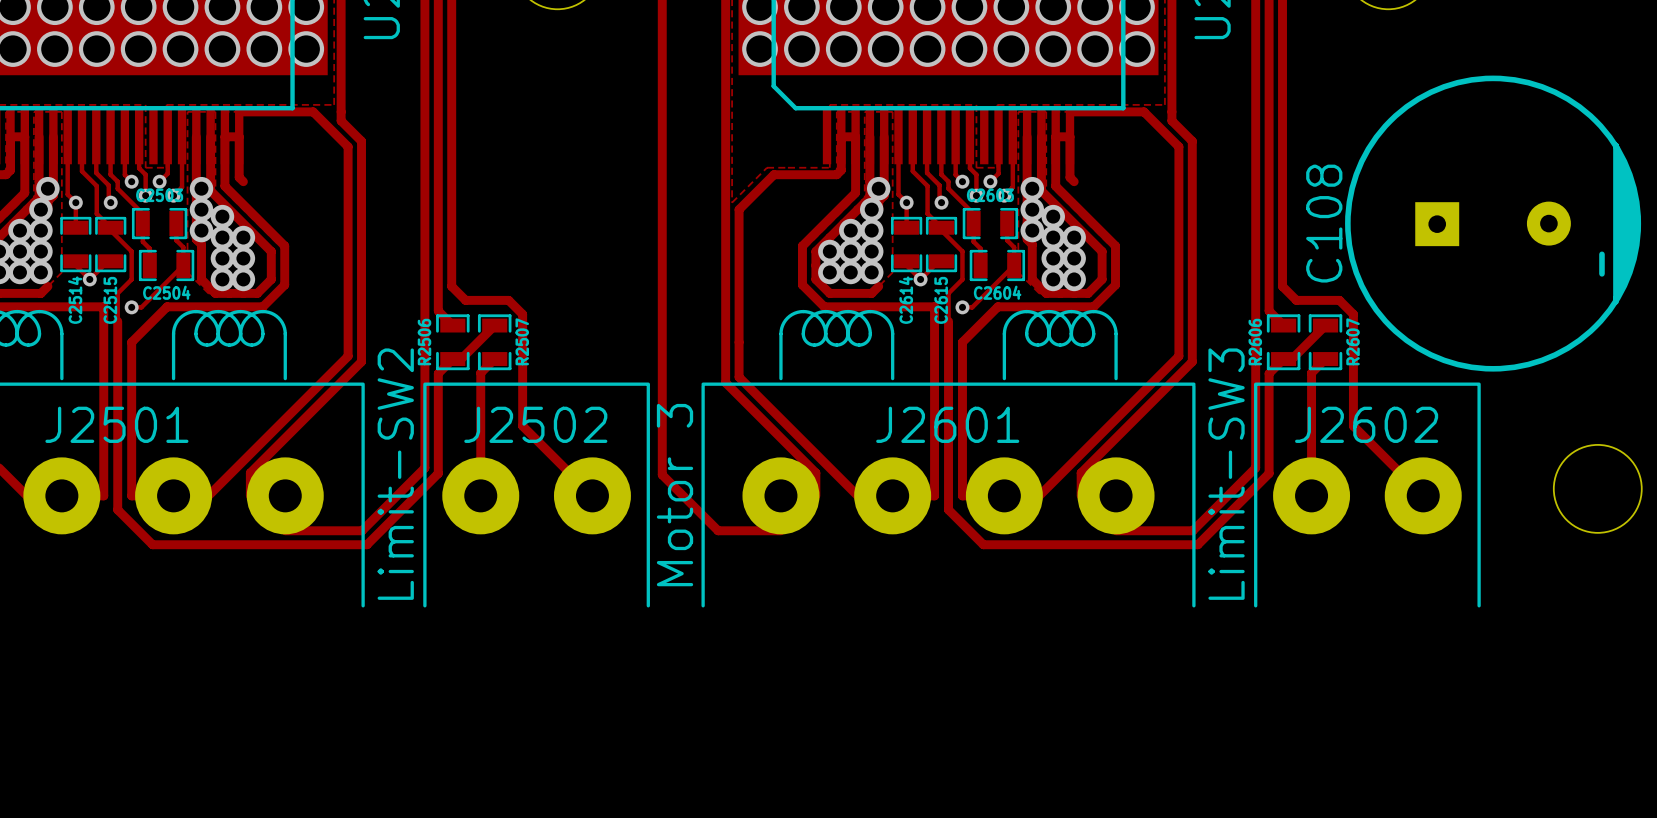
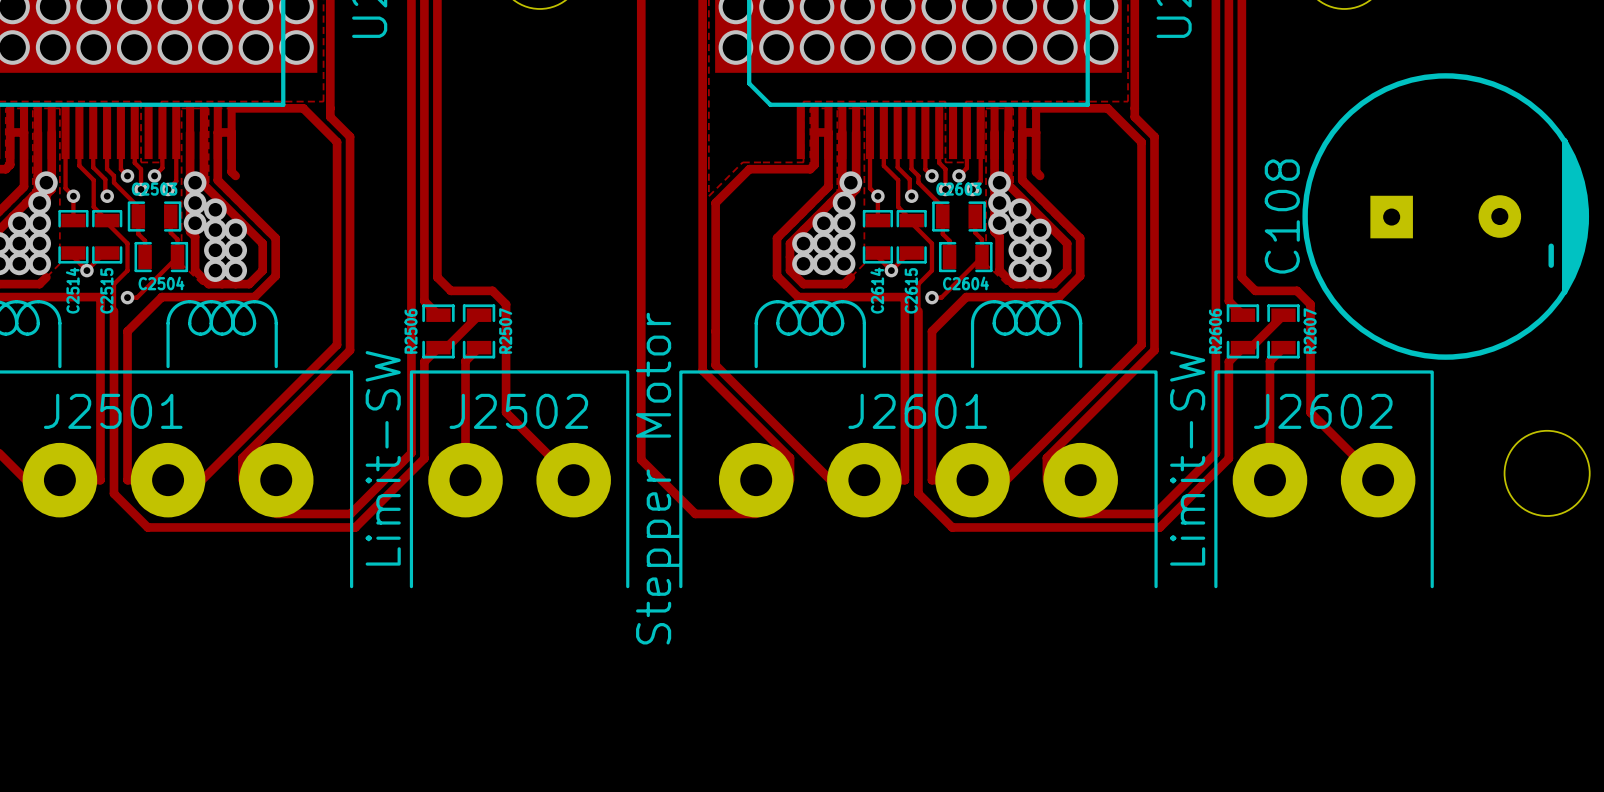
J2502 value: Limit-SW2 (395, 474) -> Limit-SW (383, 458)
J2602 value: Limit-SW3 (1226, 474) -> Limit-SW (1187, 458)
J2601 value: Motor 3 (675, 495) -> Stepper Motor (658, 478)

